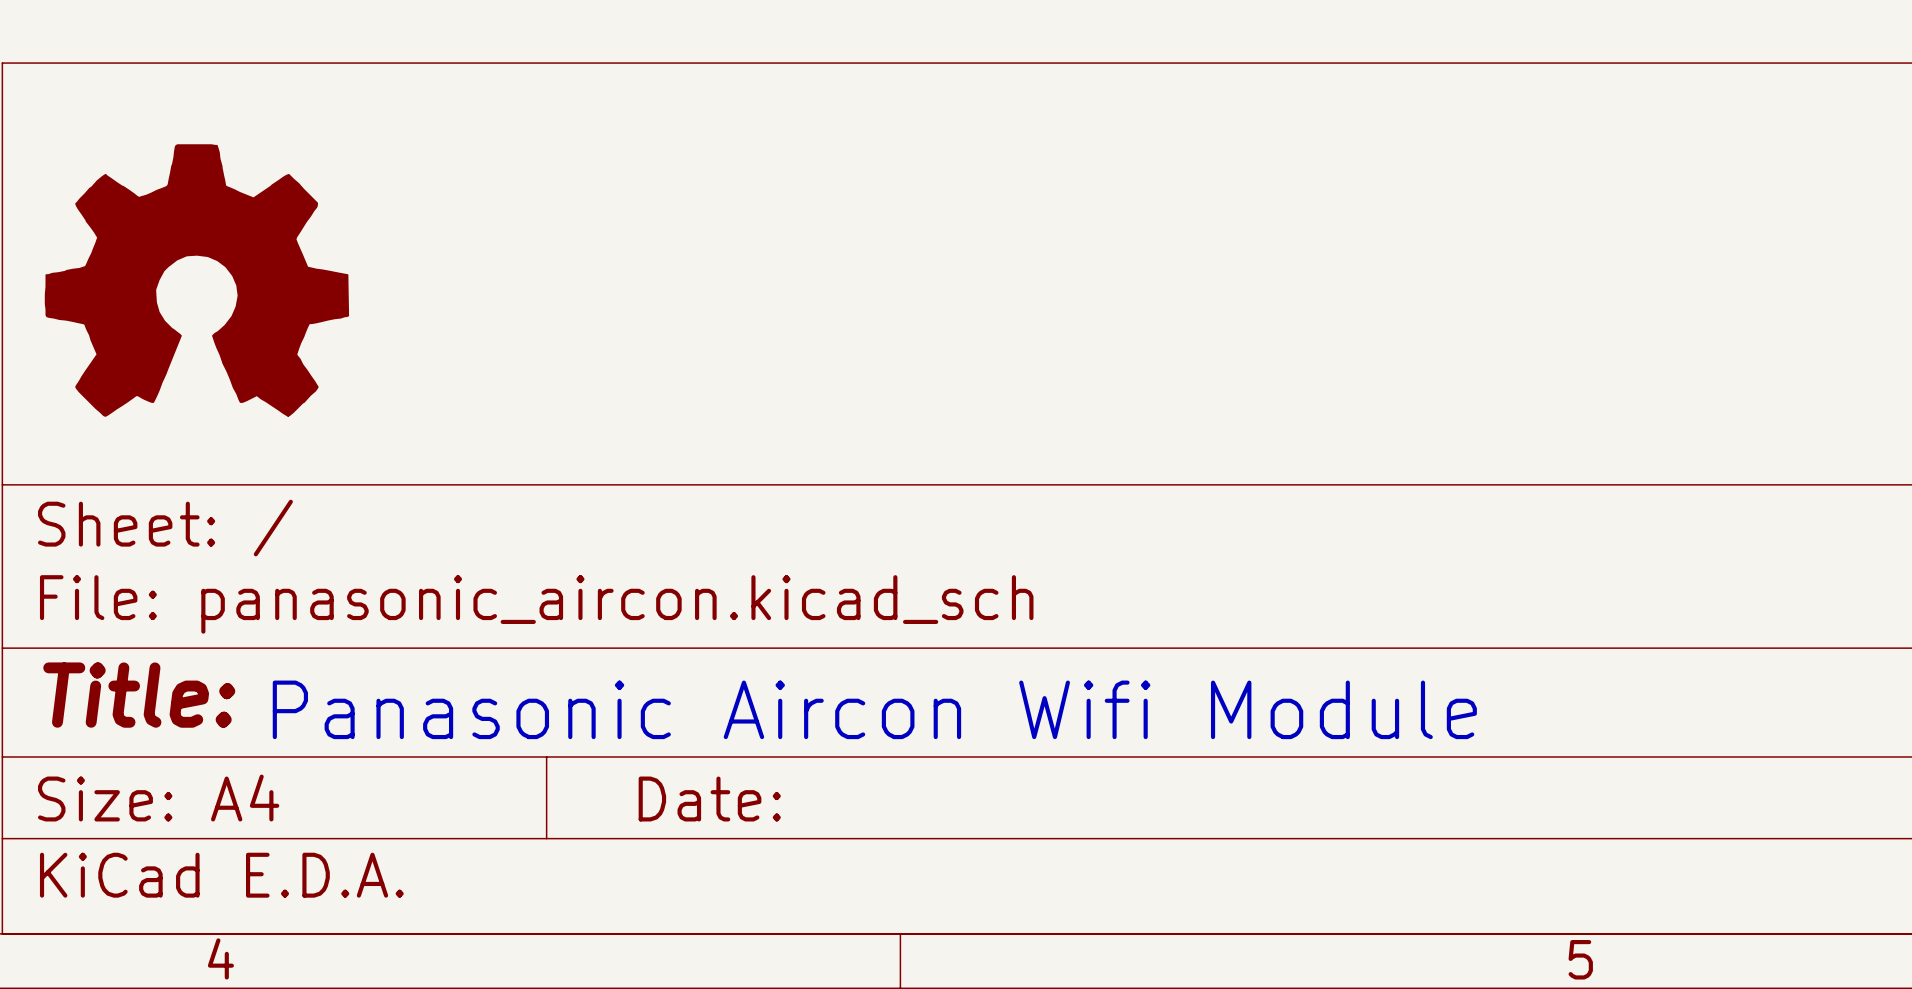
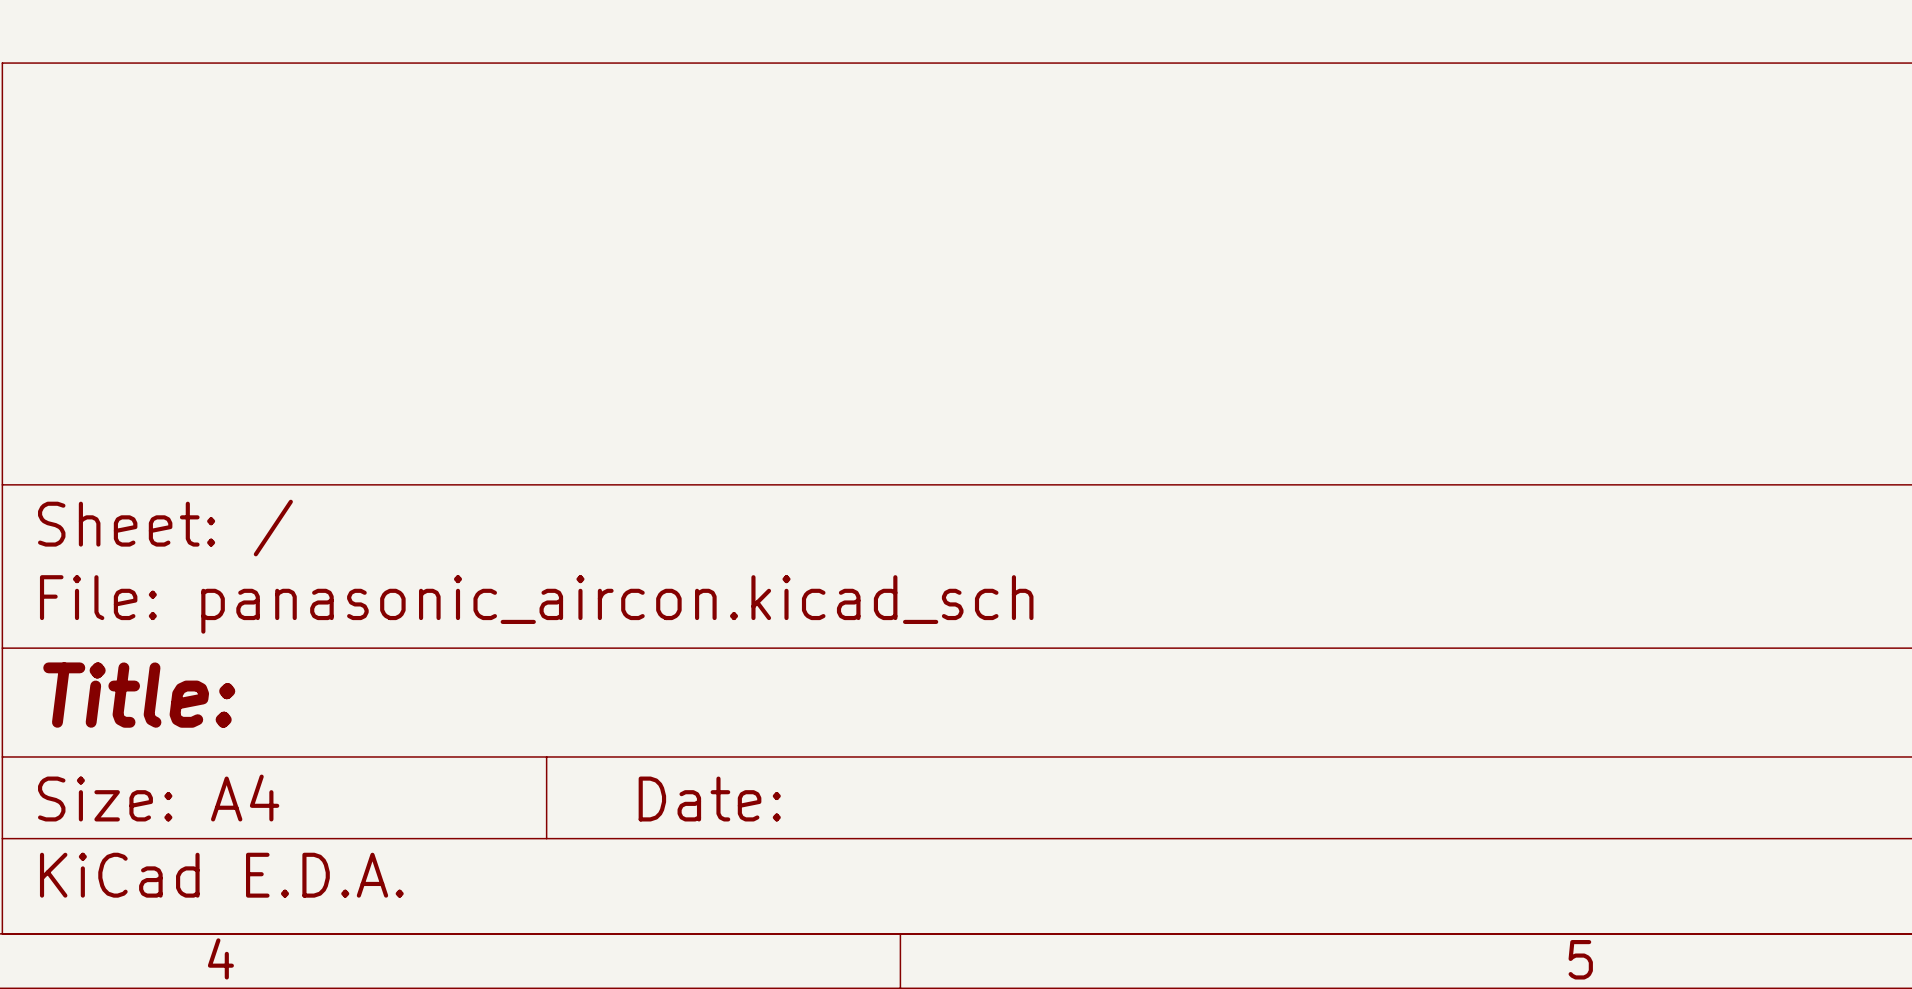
power symbol: (196, 280) -> none
text: Panasonic Aircon Wifi Module (874, 709) -> none

